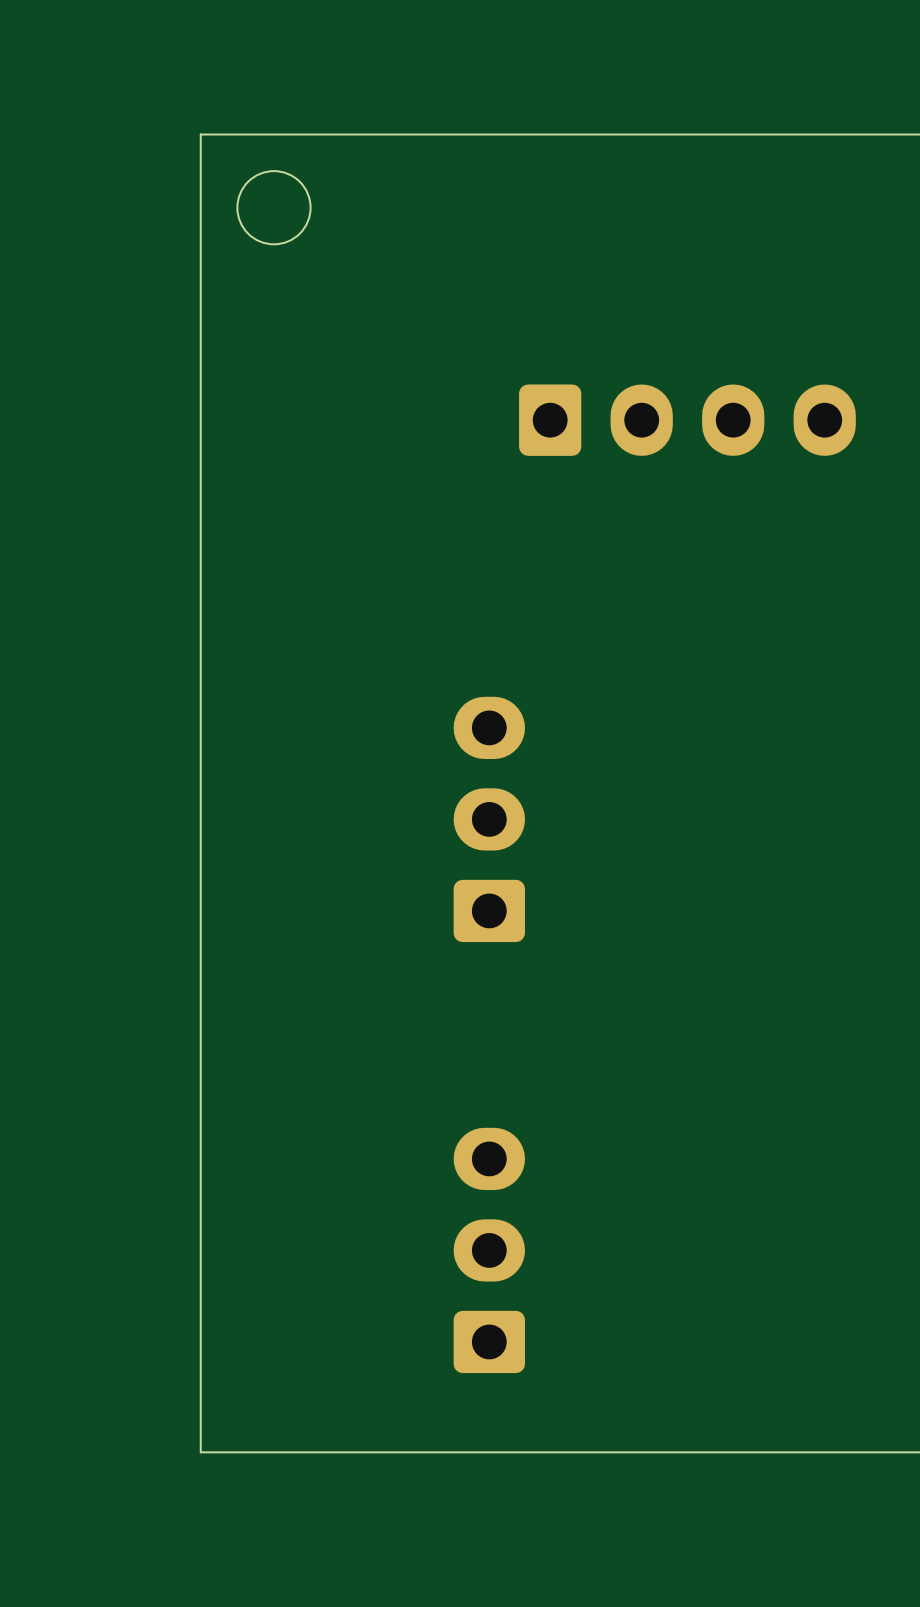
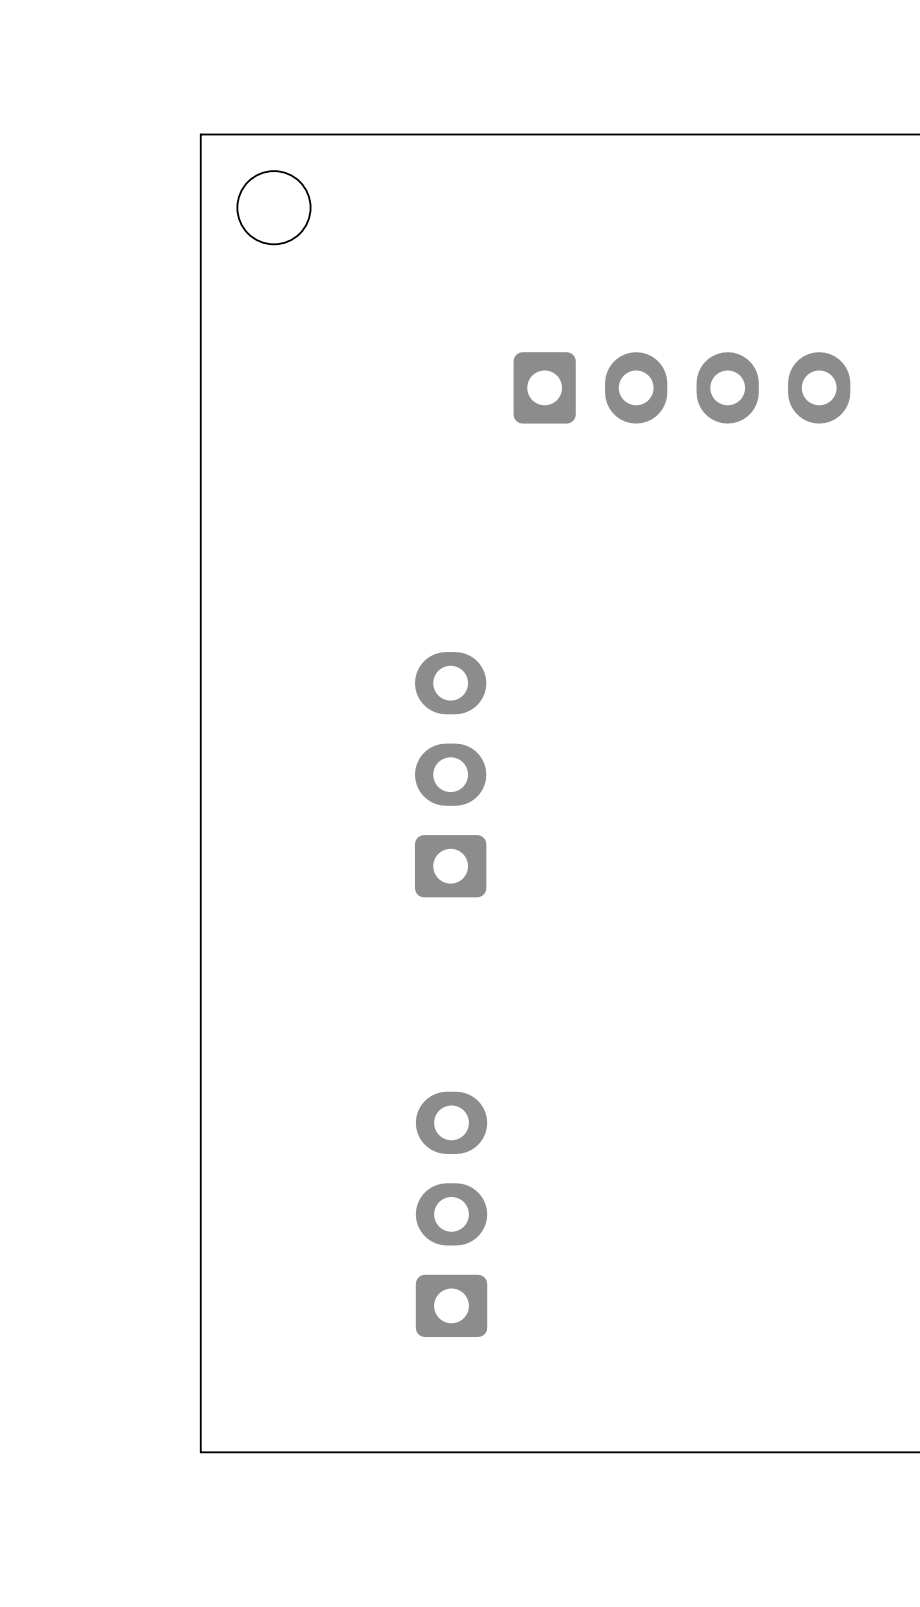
part position: (687, 420) -> (681, 387)
part position: (489, 819) -> (450, 774)
part position: (489, 1250) -> (451, 1214)

